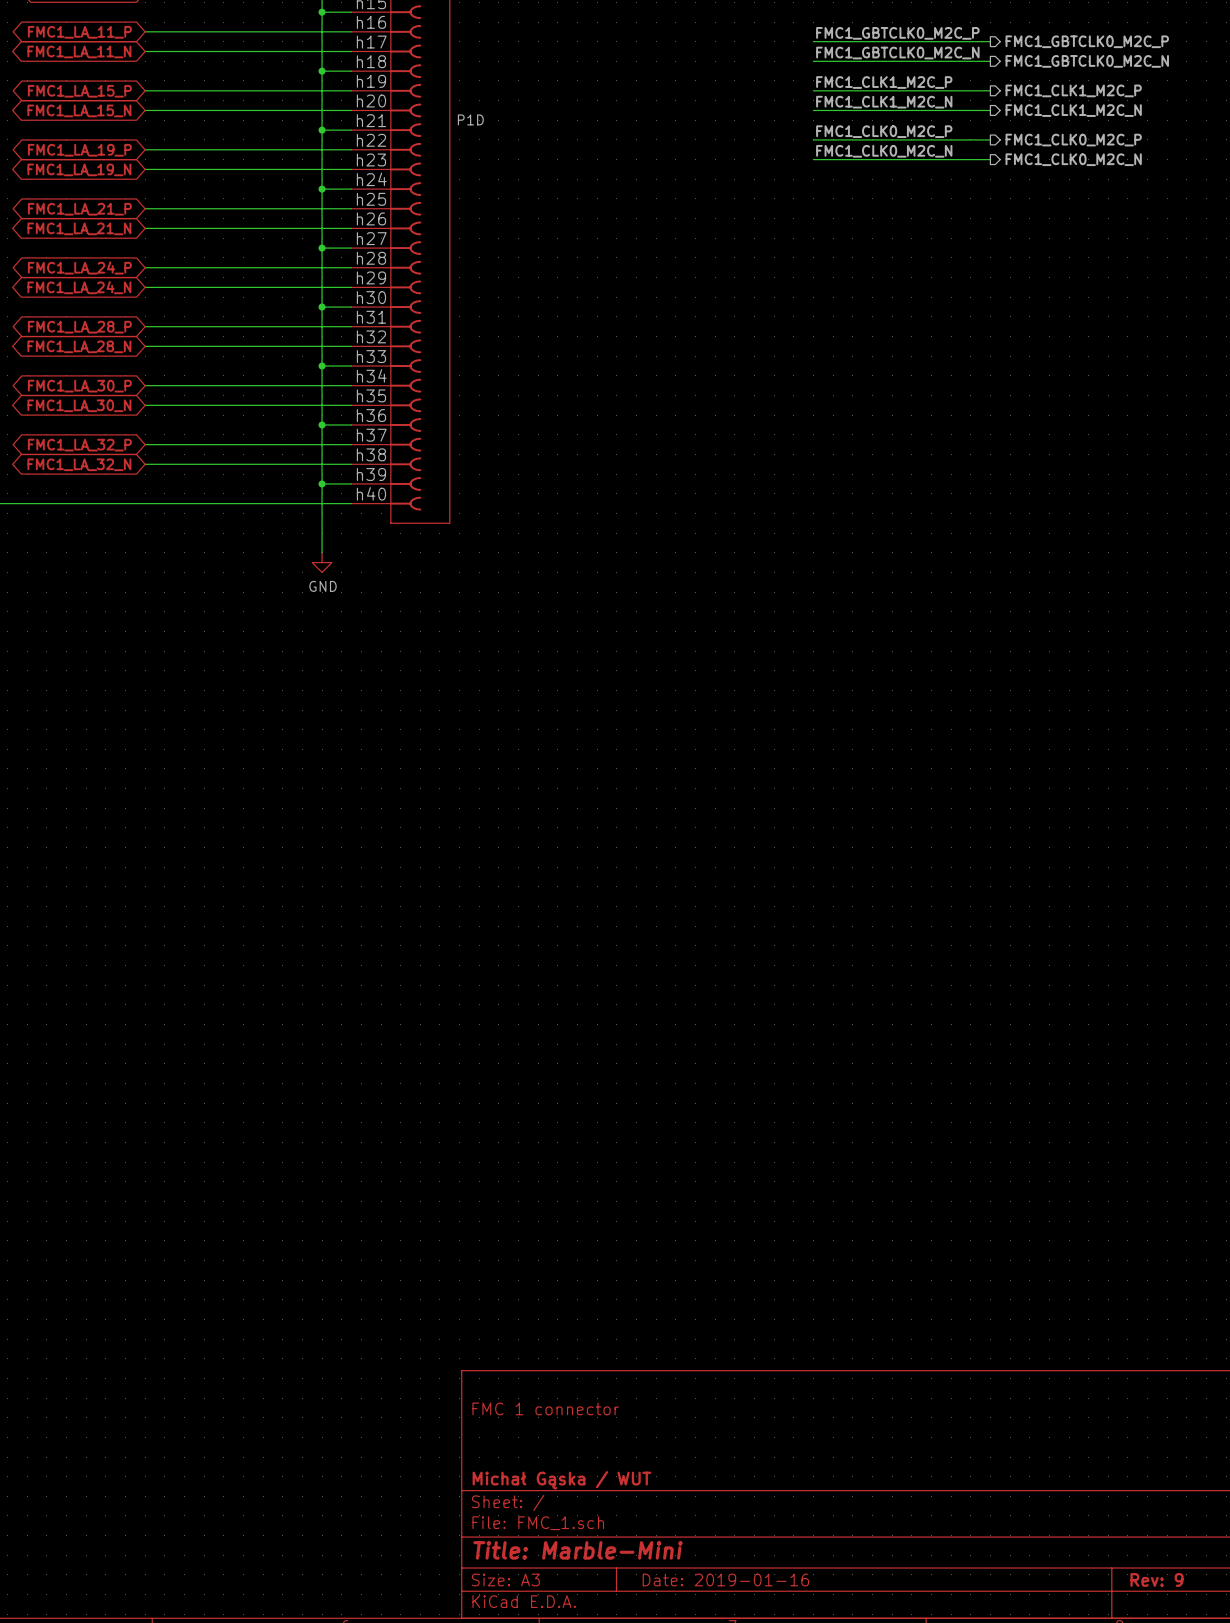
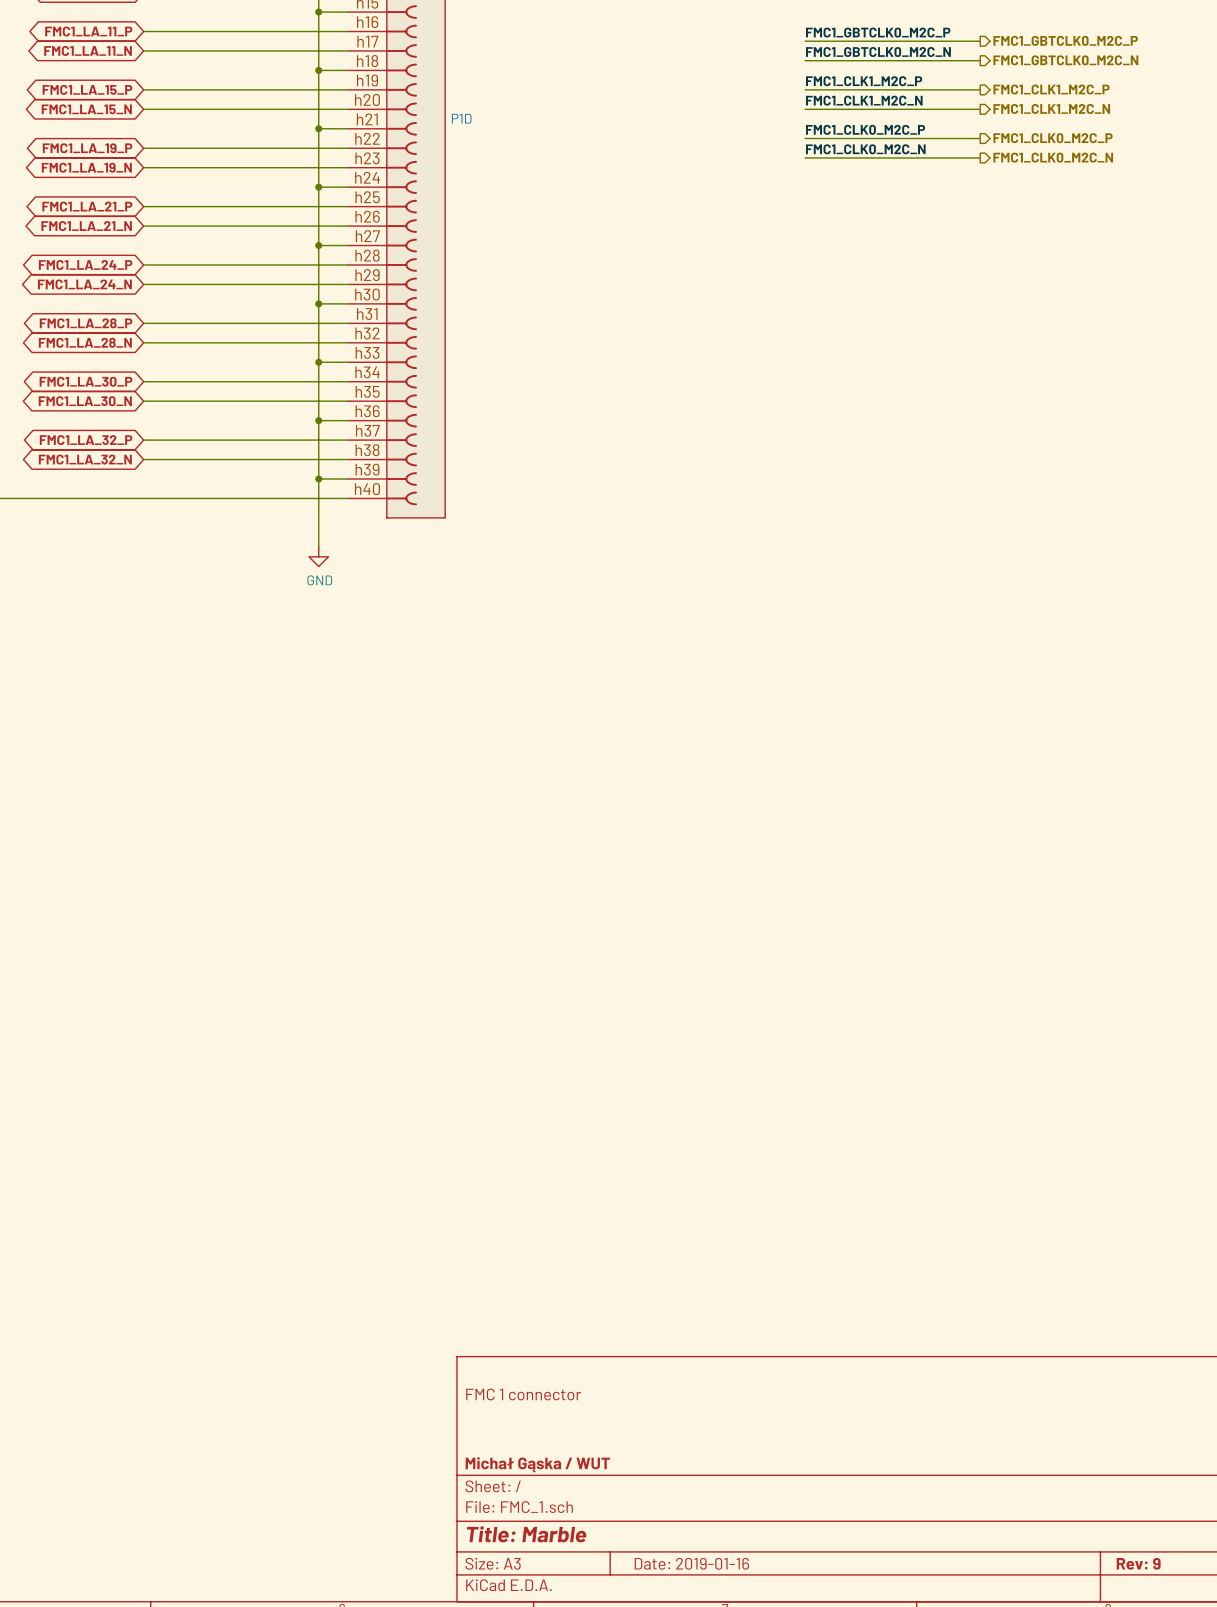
title block: Title: Marble-Mini (578, 1550) -> Title: Marble (526, 1534)

